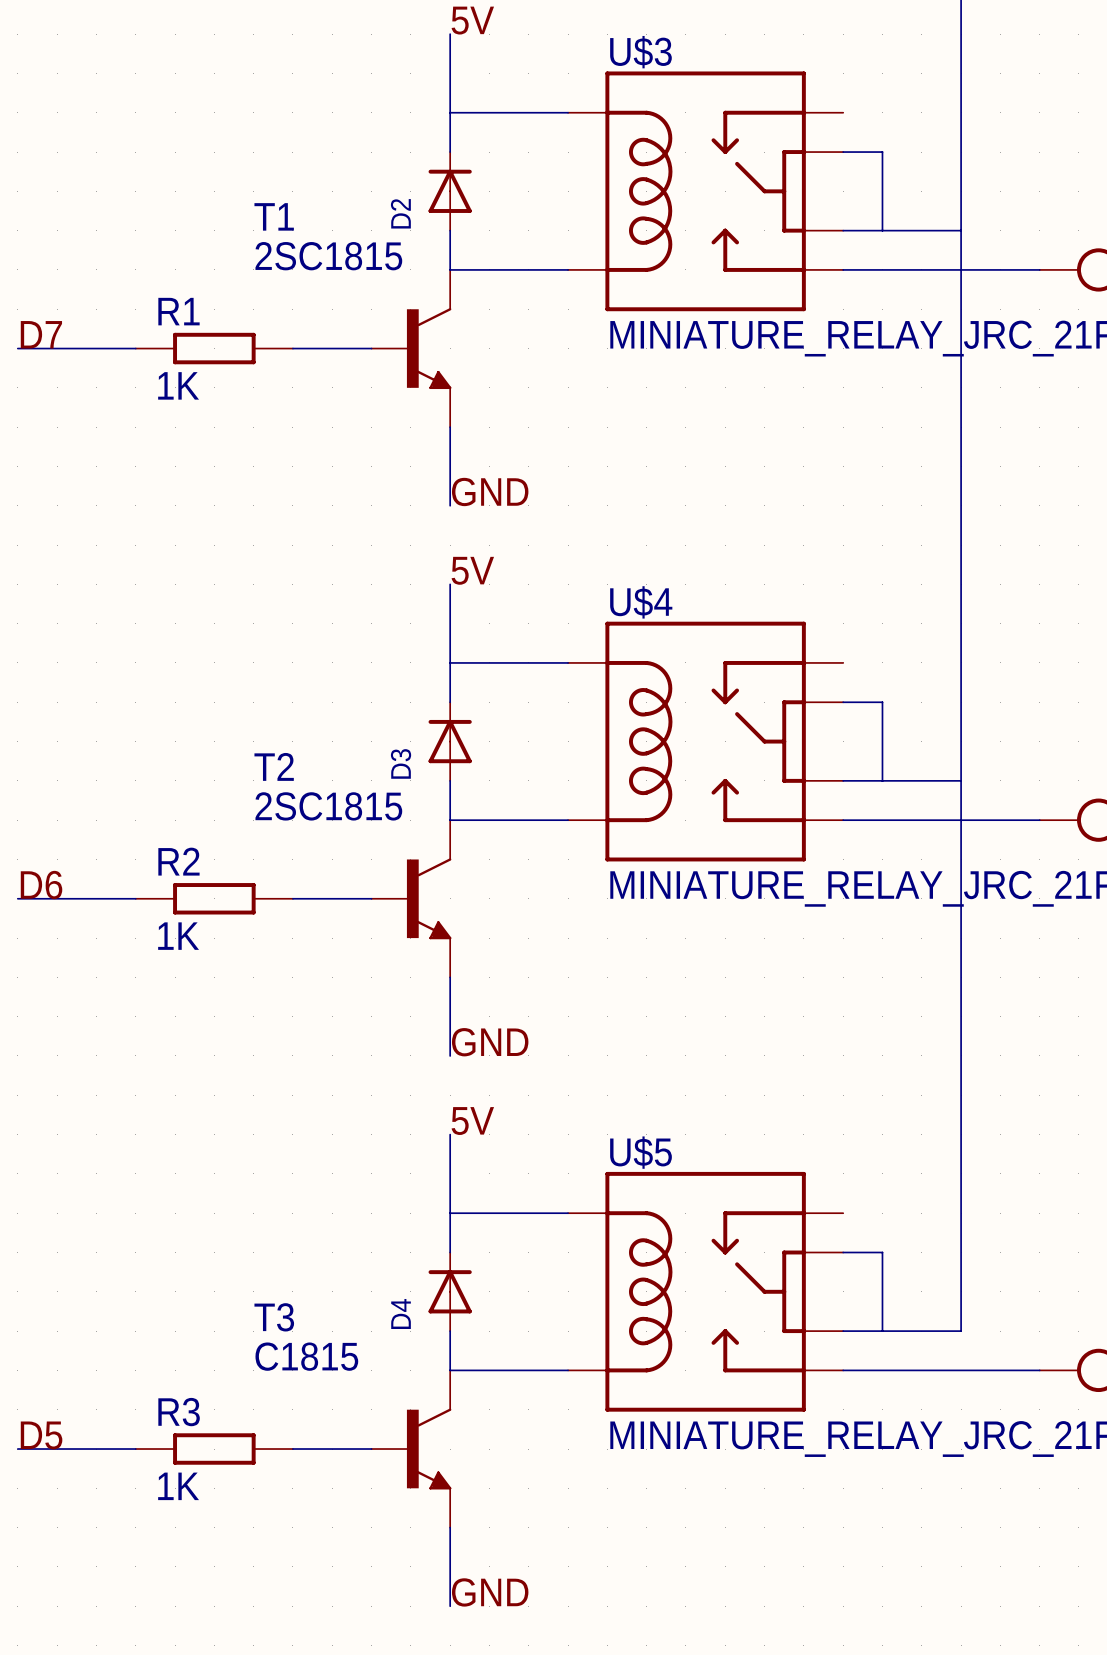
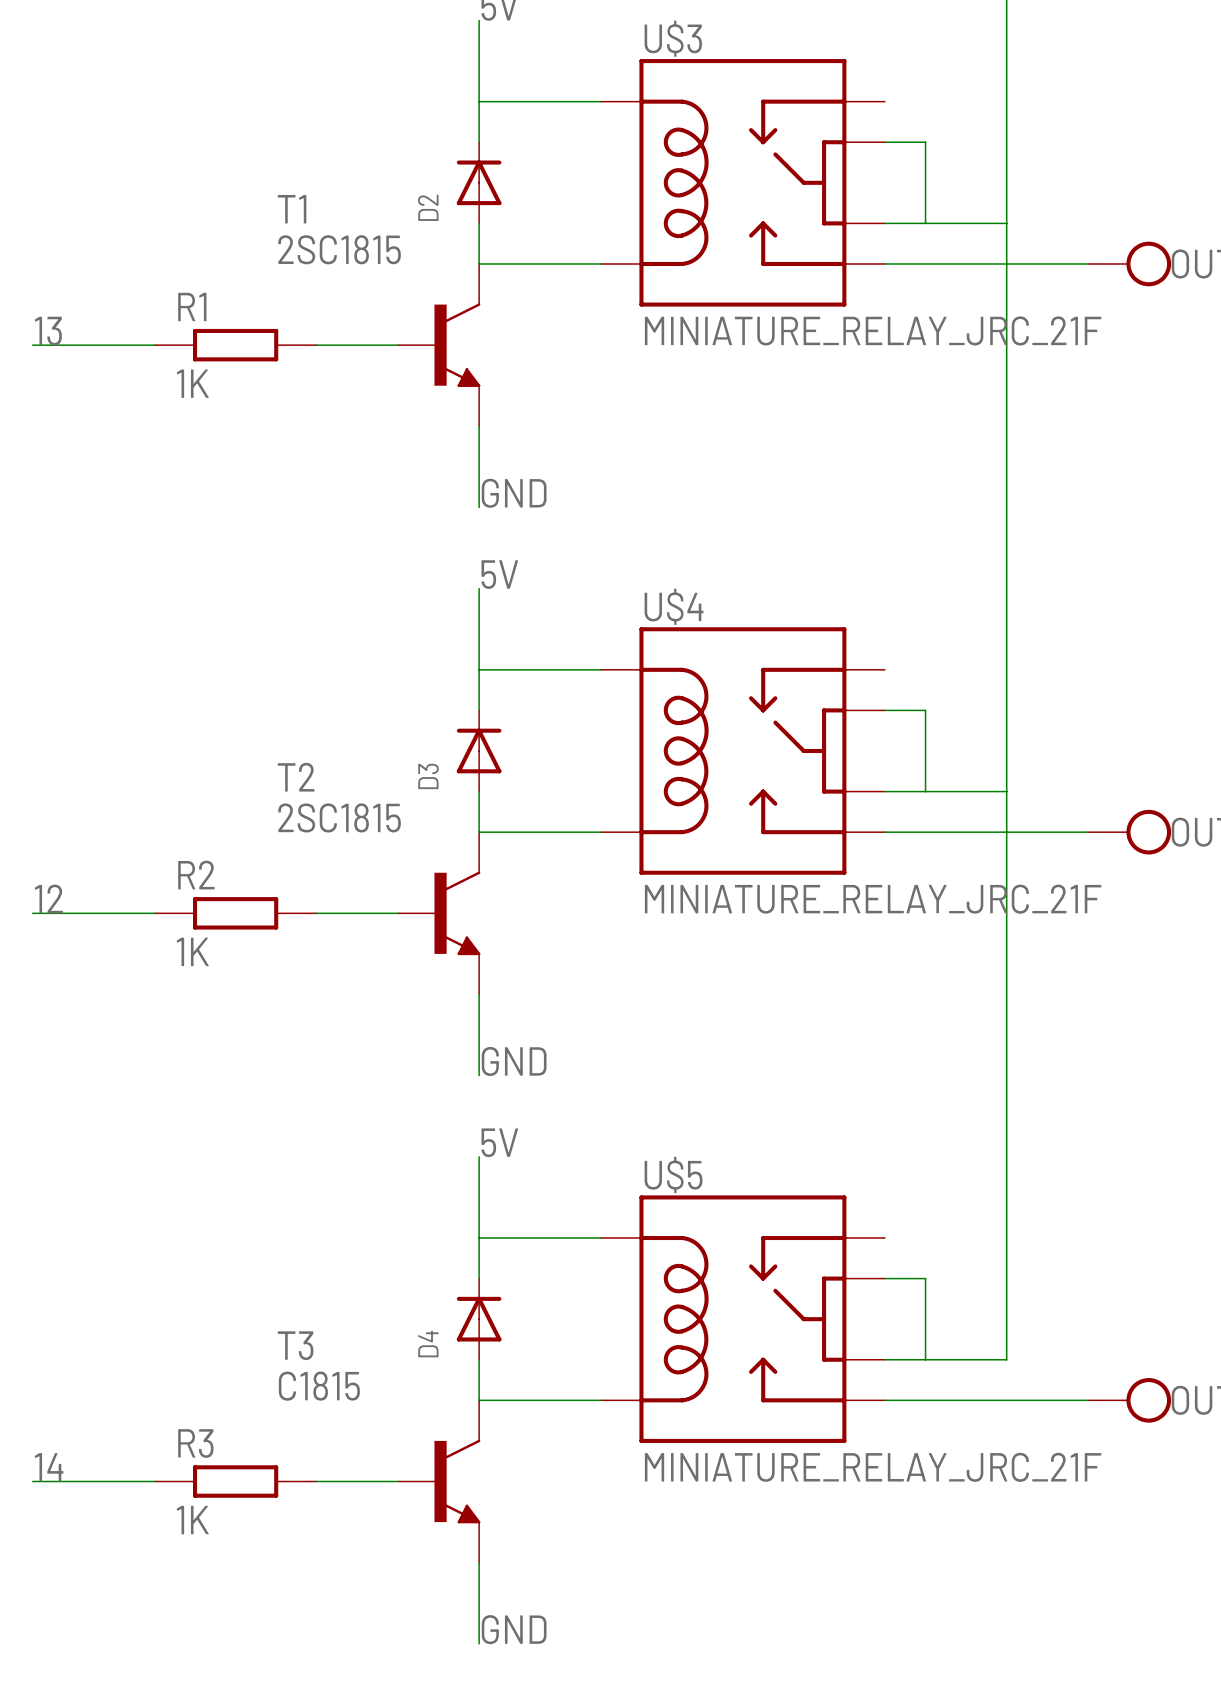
label: D7 (41, 334) -> 13 (48, 331)
label: D6 (41, 885) -> 12 (48, 898)
label: D5 (41, 1435) -> 14 (49, 1467)

